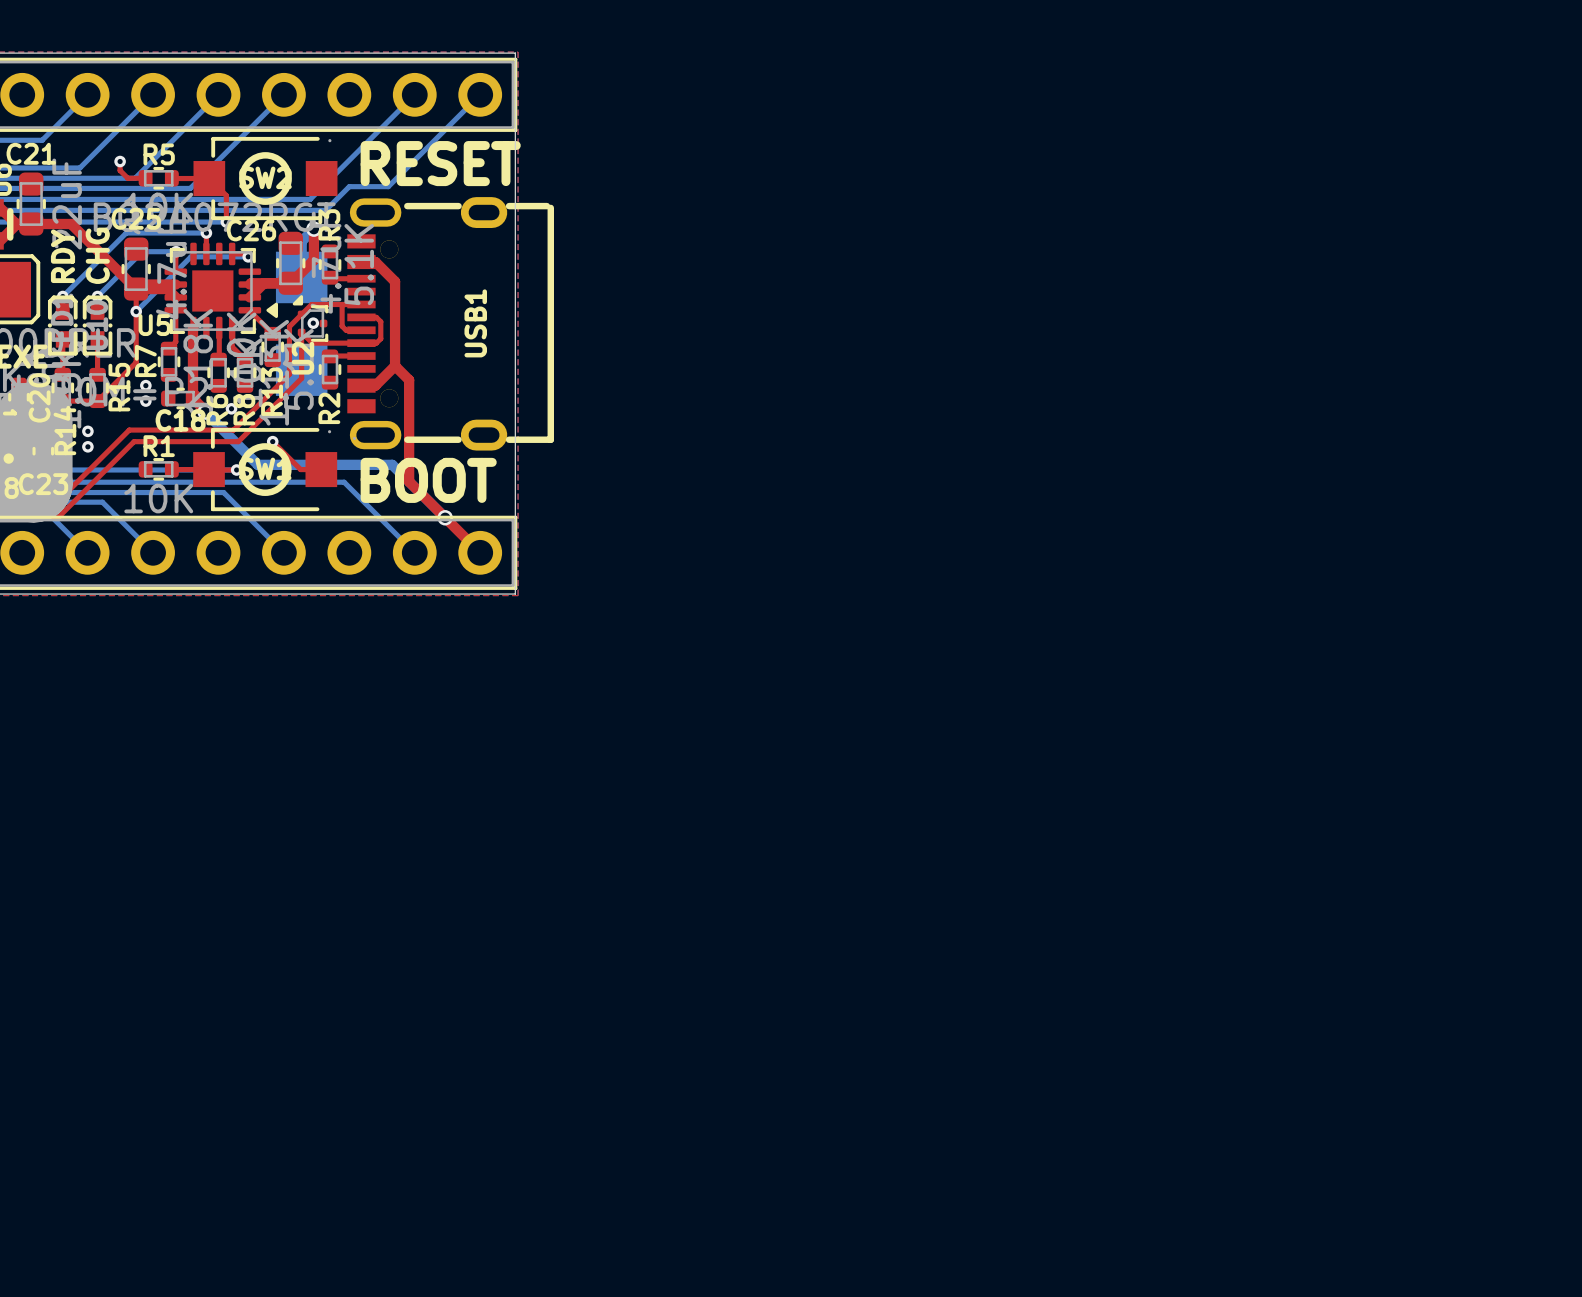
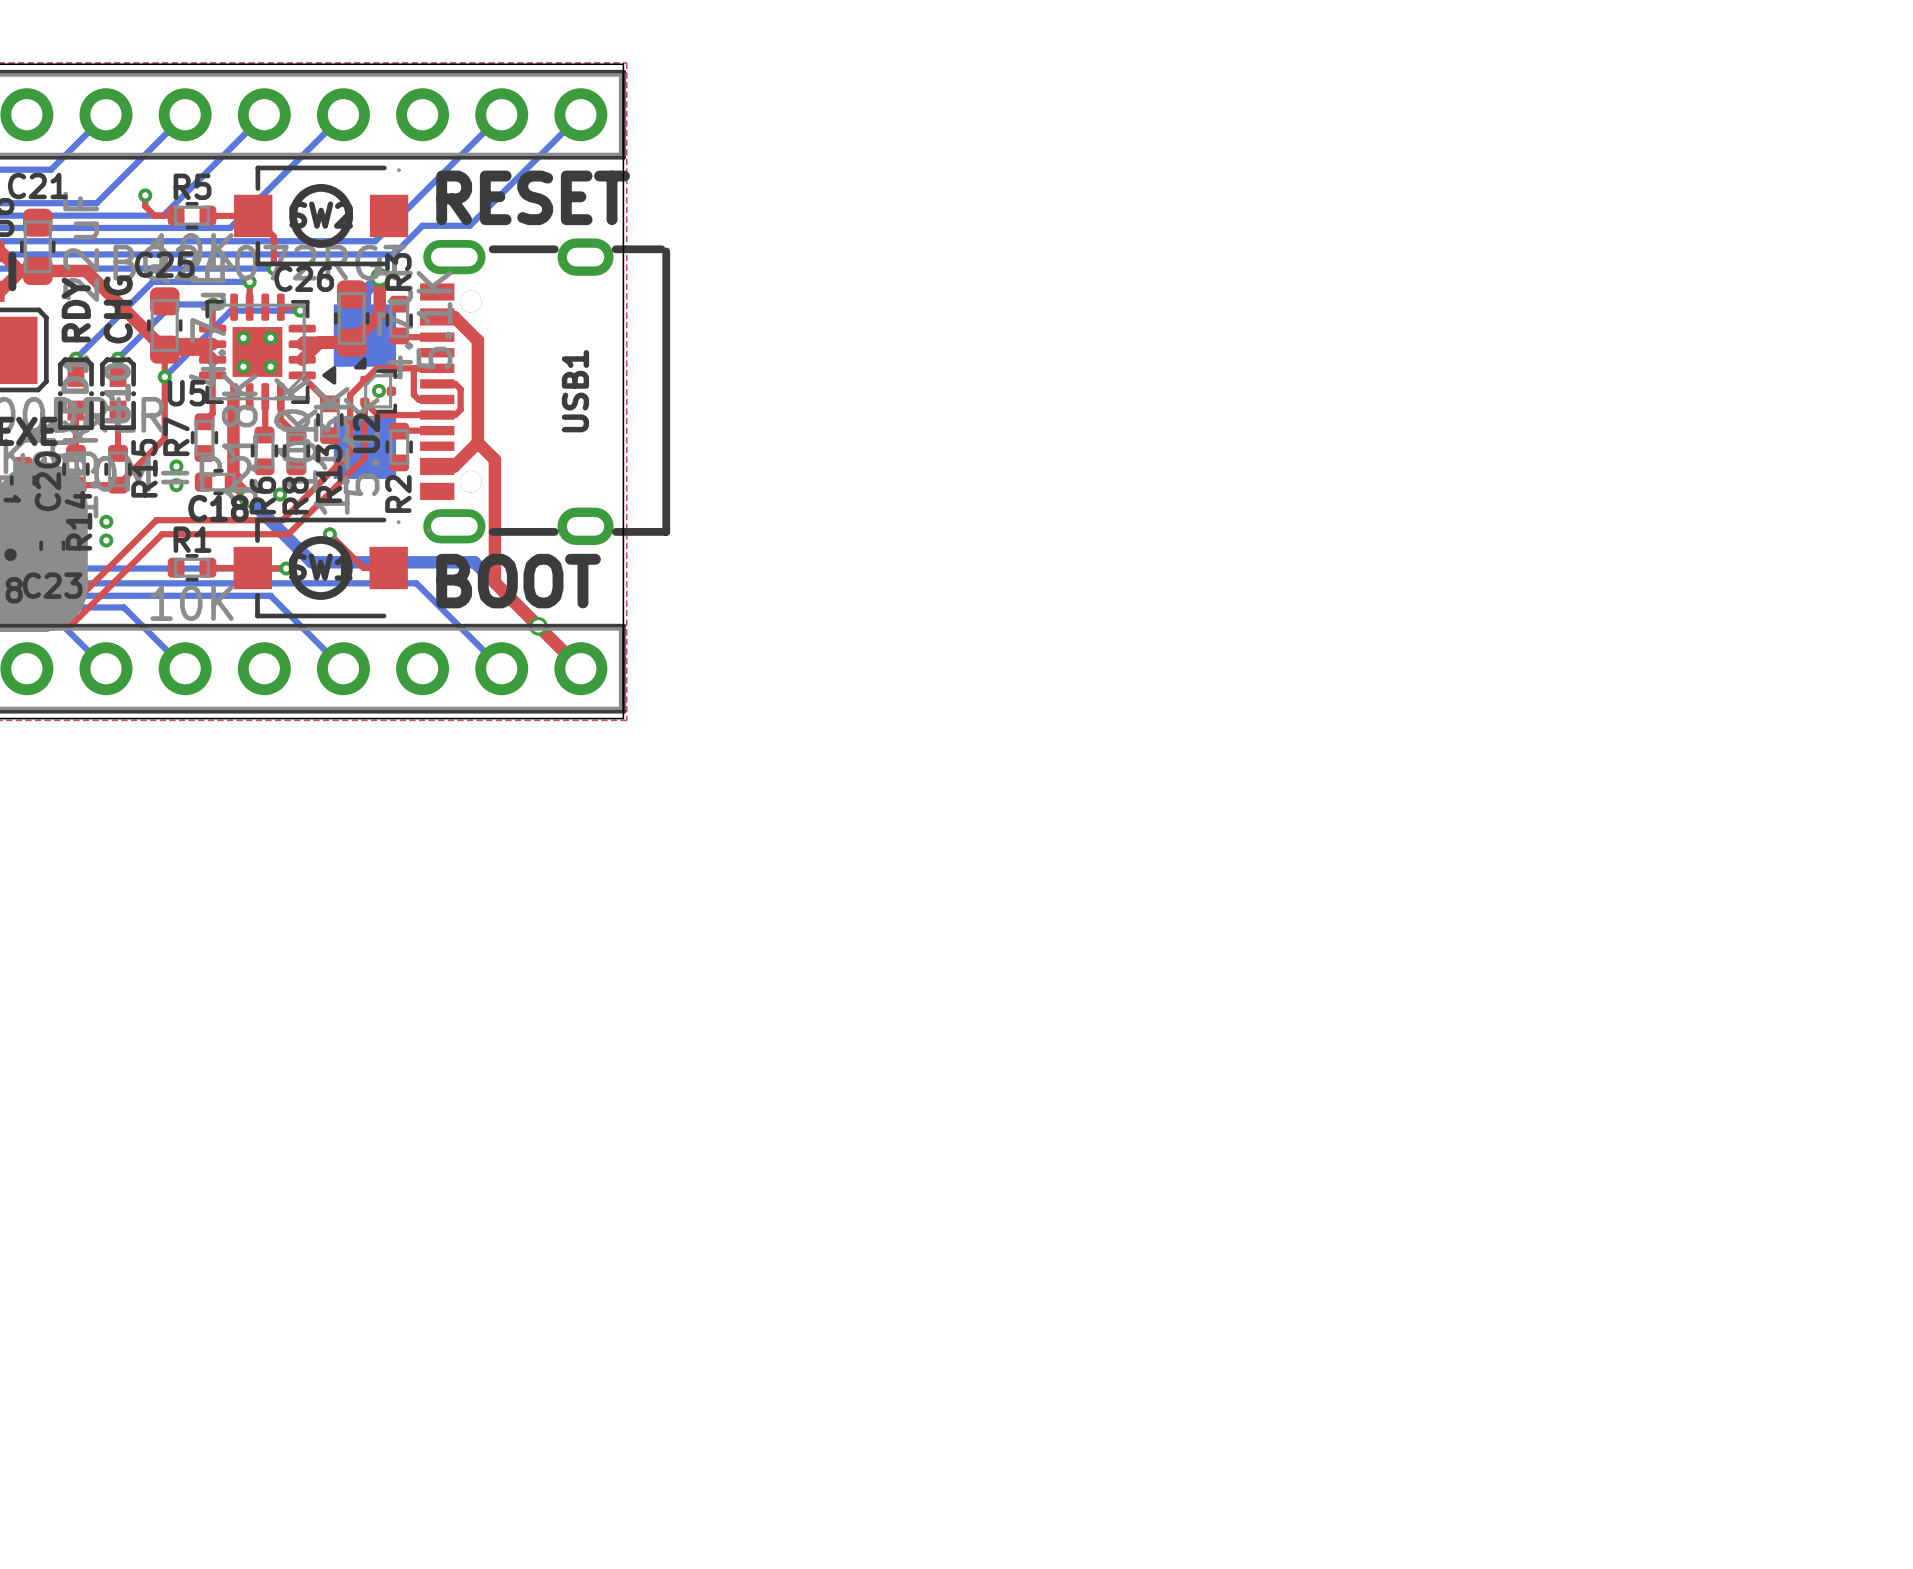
via: none -> (243, 337)
via: none -> (270, 337)
via: none -> (243, 366)
via: none -> (270, 366)

